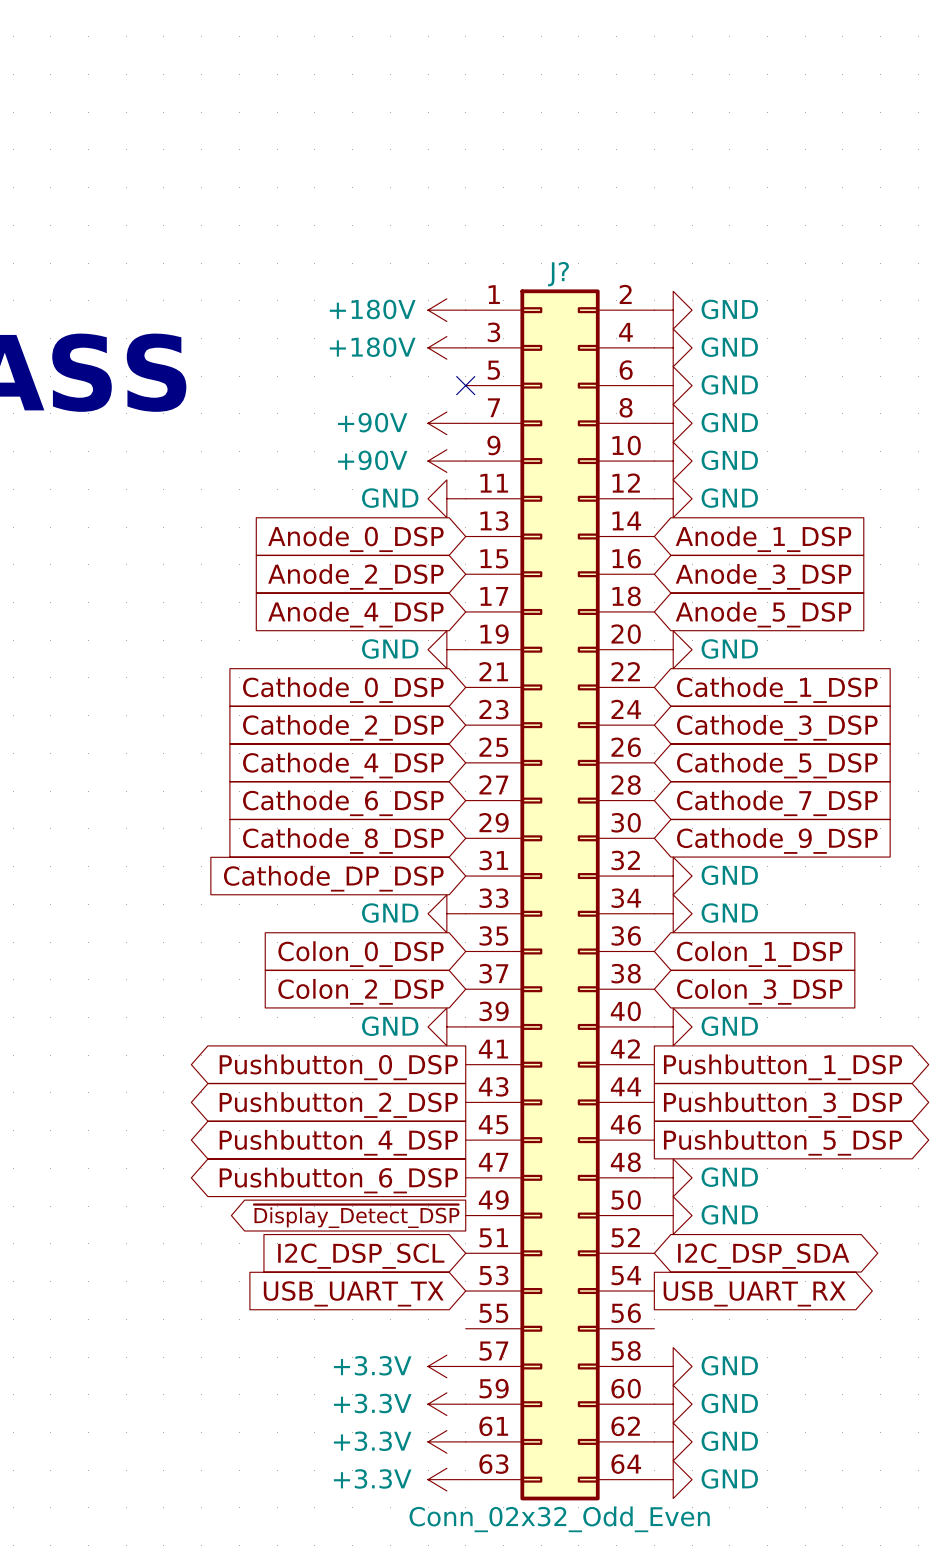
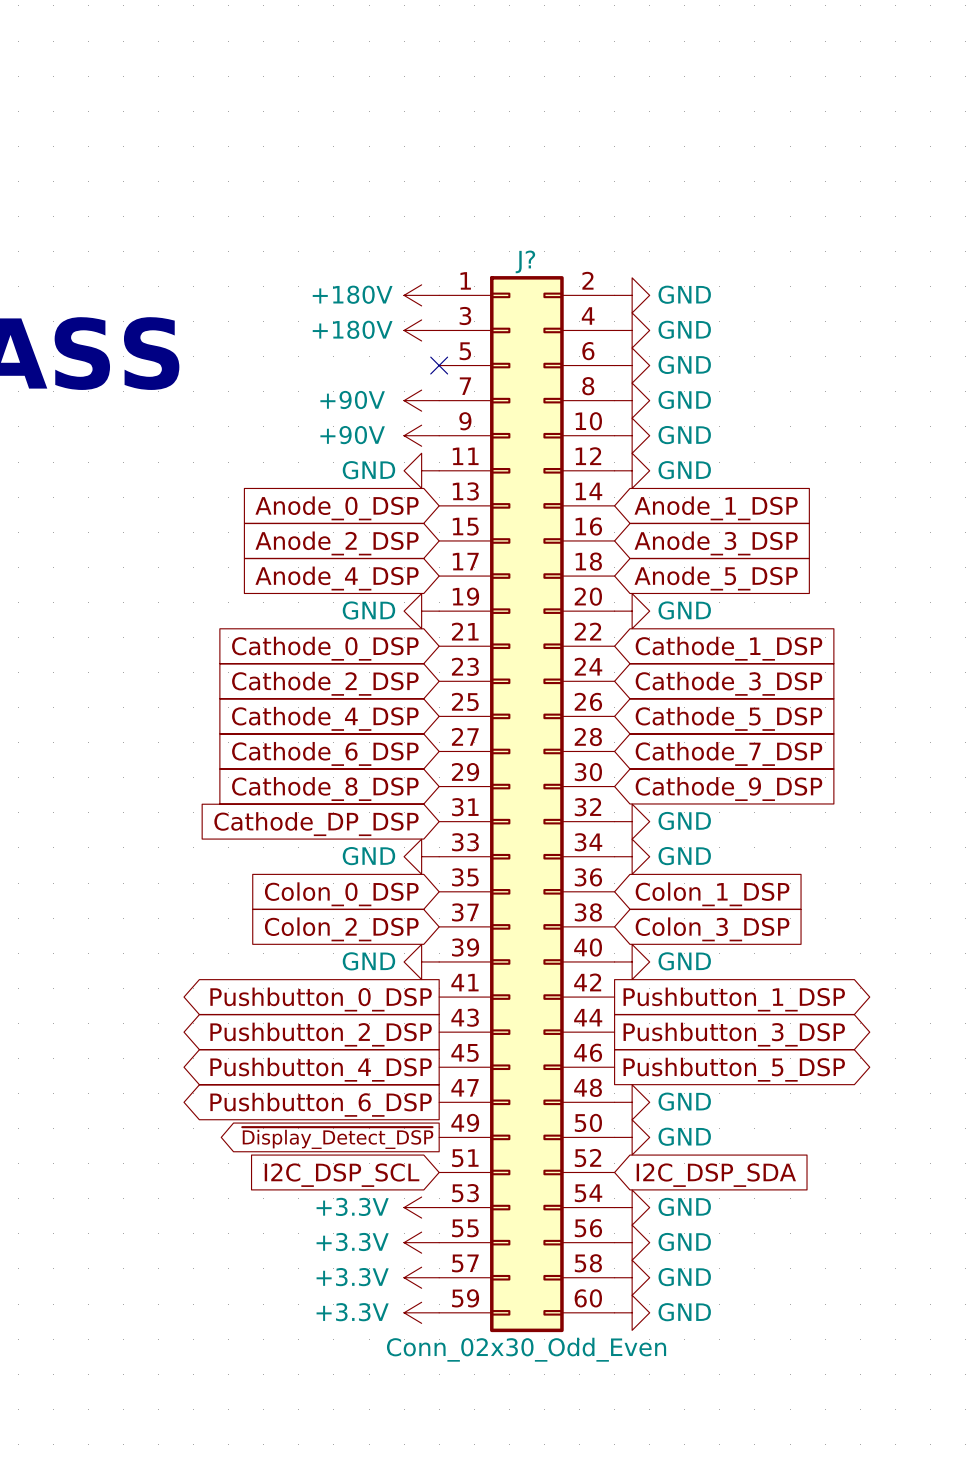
J?: none -> Conn_02x30_Odd_Even (526, 804)
J?: Conn_02x32_Odd_Even (560, 894) -> none
global label shape: bidirectional (763, 1256) -> input (716, 1175)
power symbol: none -> +3.3V (421, 1207)
power symbol: none -> GND (632, 1207)
global label: USB_UART_TX (353, 1293) -> none
global label: USB_UART_RX (754, 1293) -> none
power symbol: none -> +3.3V (421, 1242)
power symbol: none -> GND (632, 1242)
power symbol: +3.3V (446, 1441) -> none
power symbol: GND (673, 1441) -> none
power symbol: +3.3V (446, 1479) -> none
power symbol: GND (673, 1479) -> none

